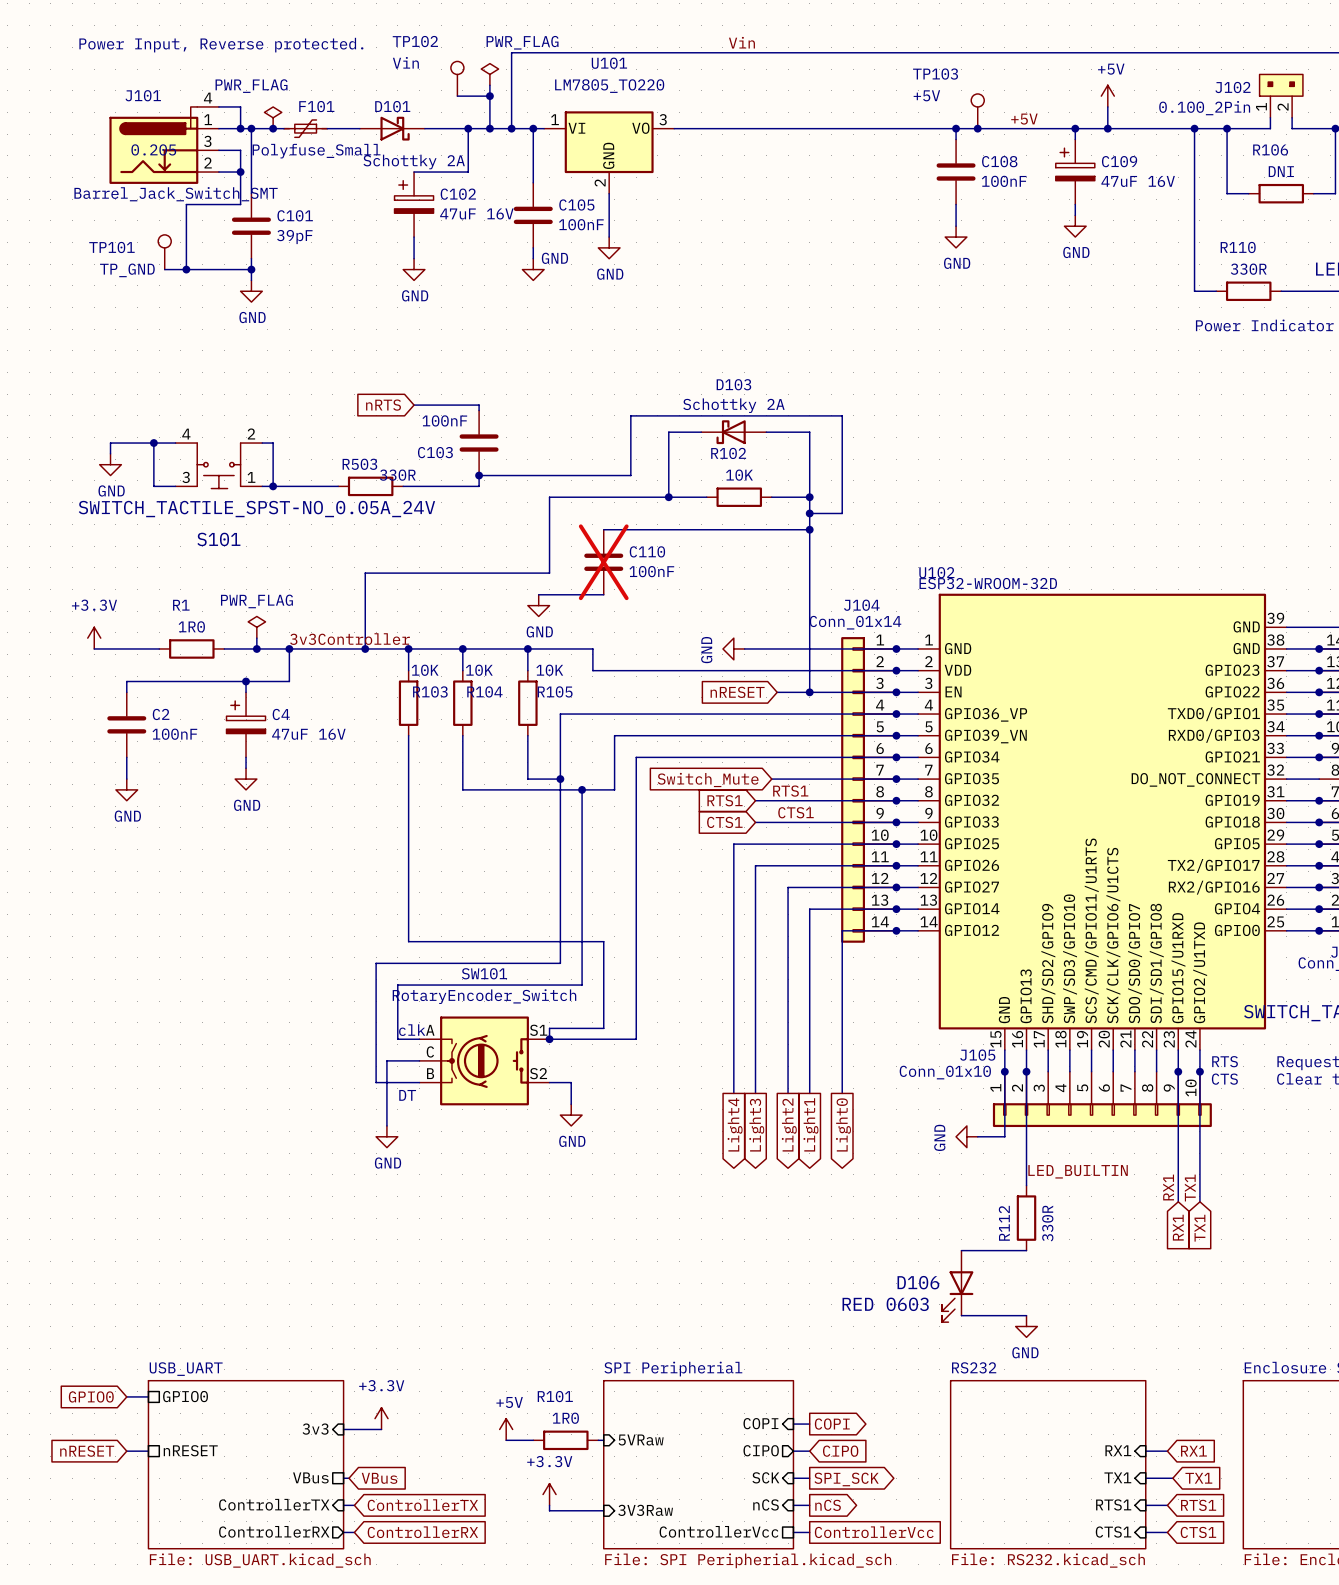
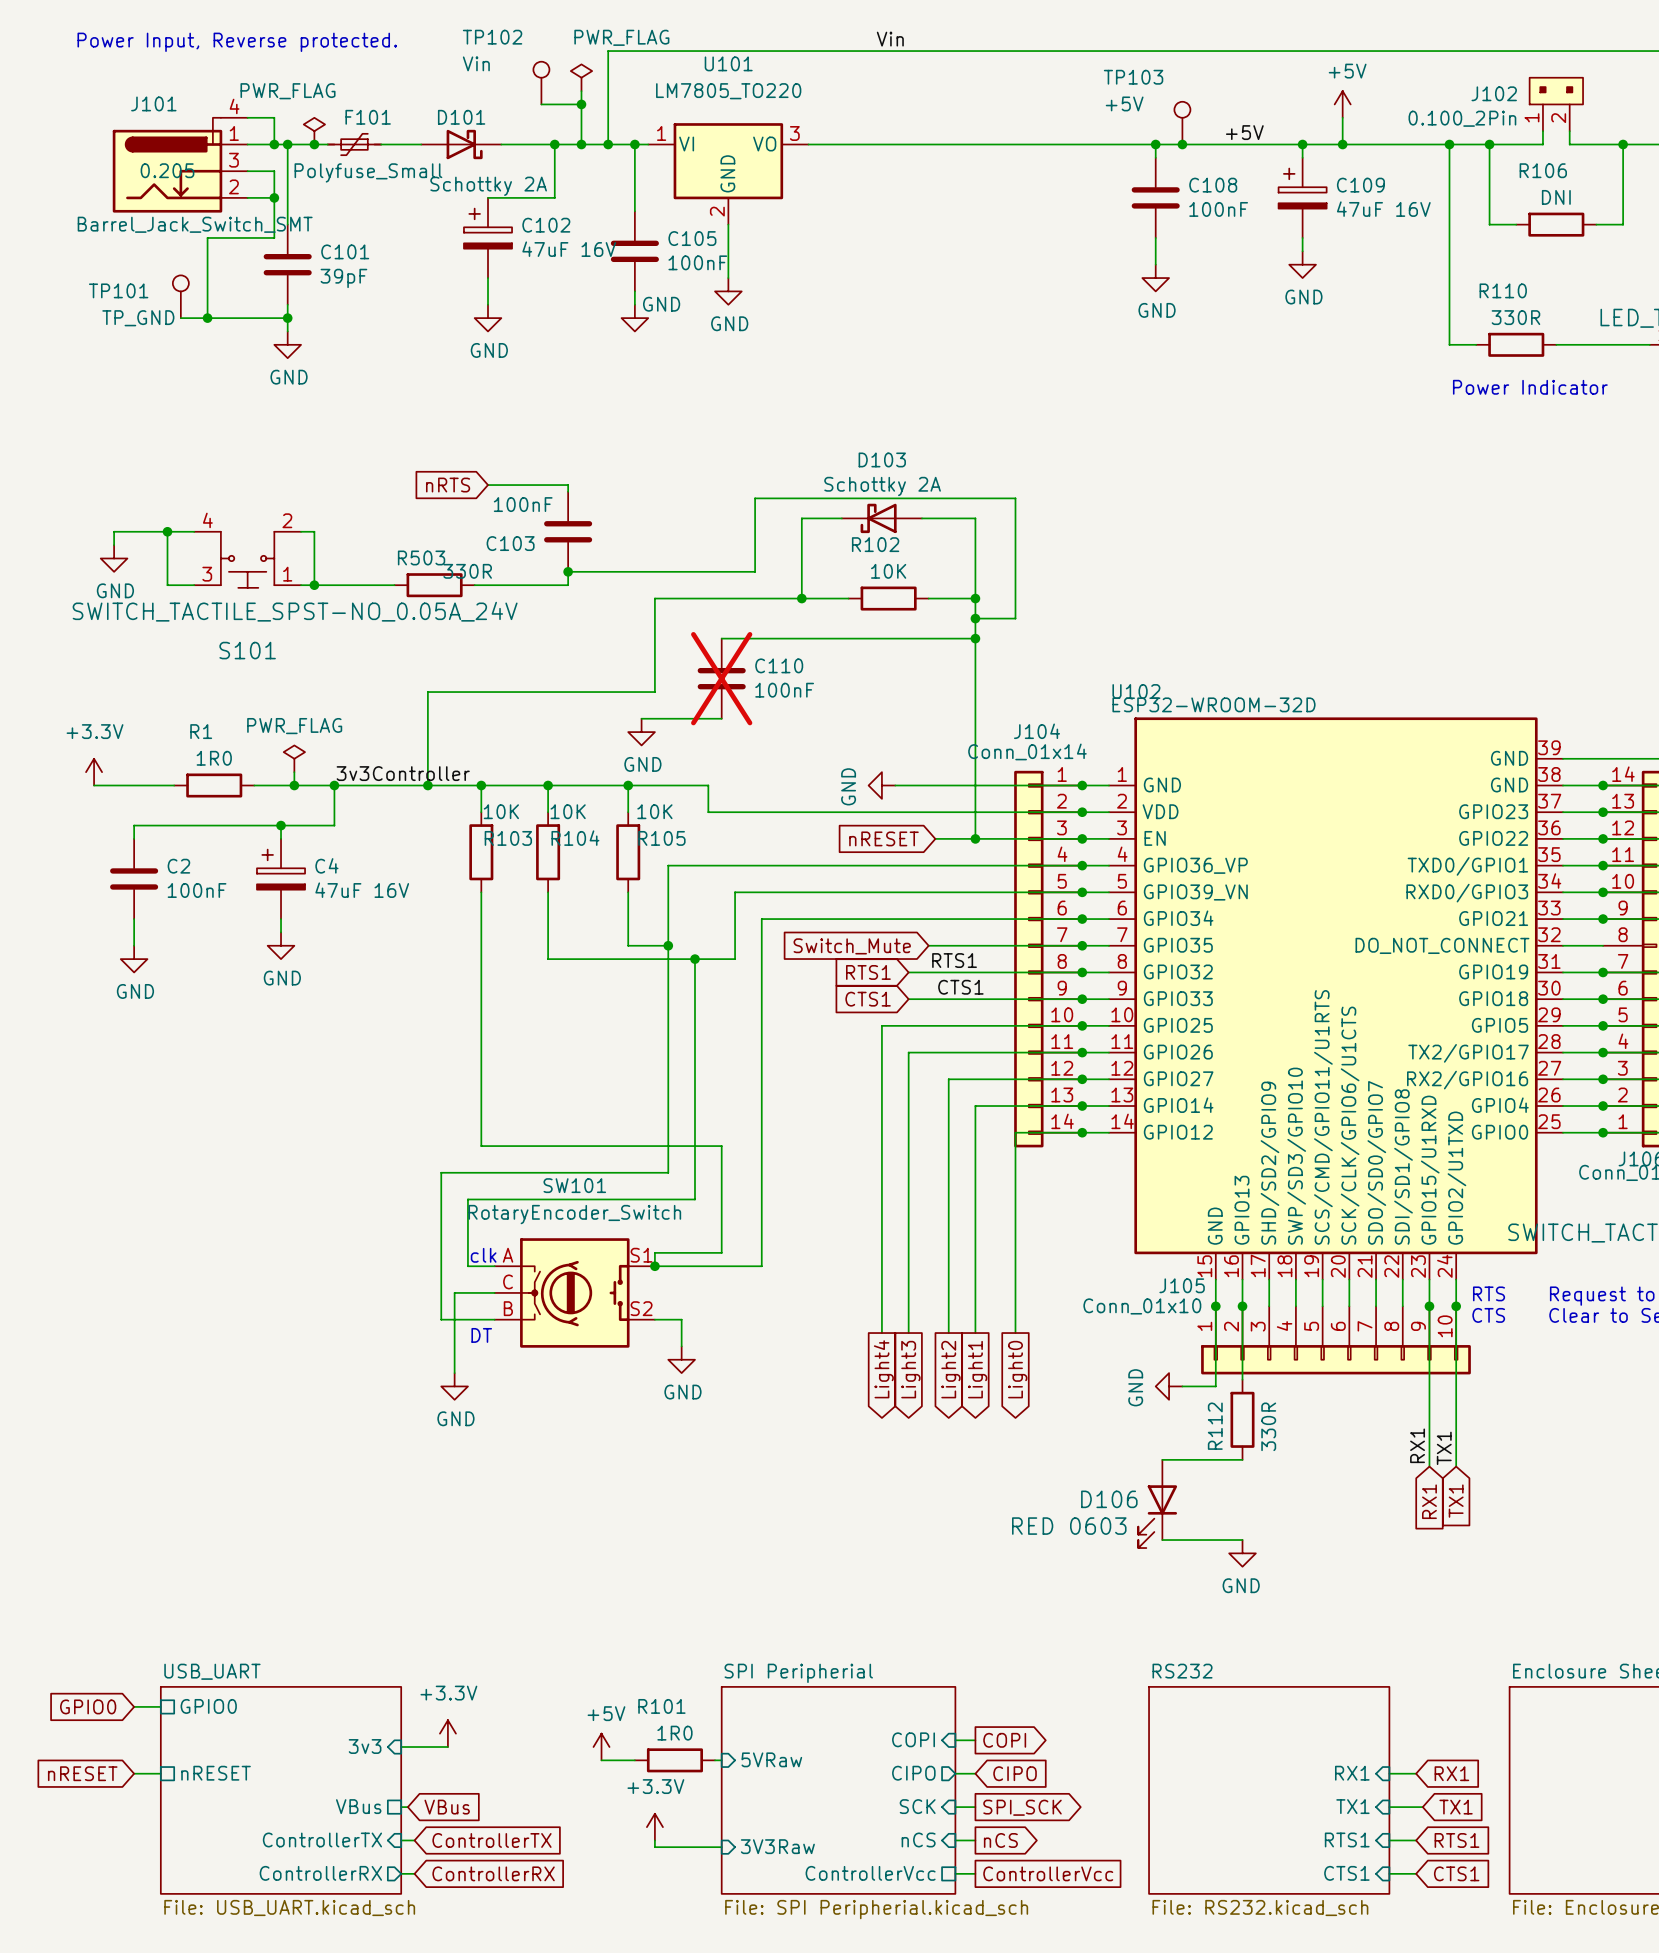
wire: (1026, 1131) (1026, 1185) -> none
label: LED_BUILTIN (1078, 1171) -> none
R112 position: (1026, 1218) -> (1242, 1419)
wire: (961, 1250) (1026, 1250) -> (1162, 1459) (1242, 1459)
D106 position: (957, 1286) -> (1157, 1503)
wire: (961, 1315) (1026, 1315) -> (1162, 1540) (1242, 1540)
power symbol position: GND (1026, 1326) -> GND (1242, 1553)

